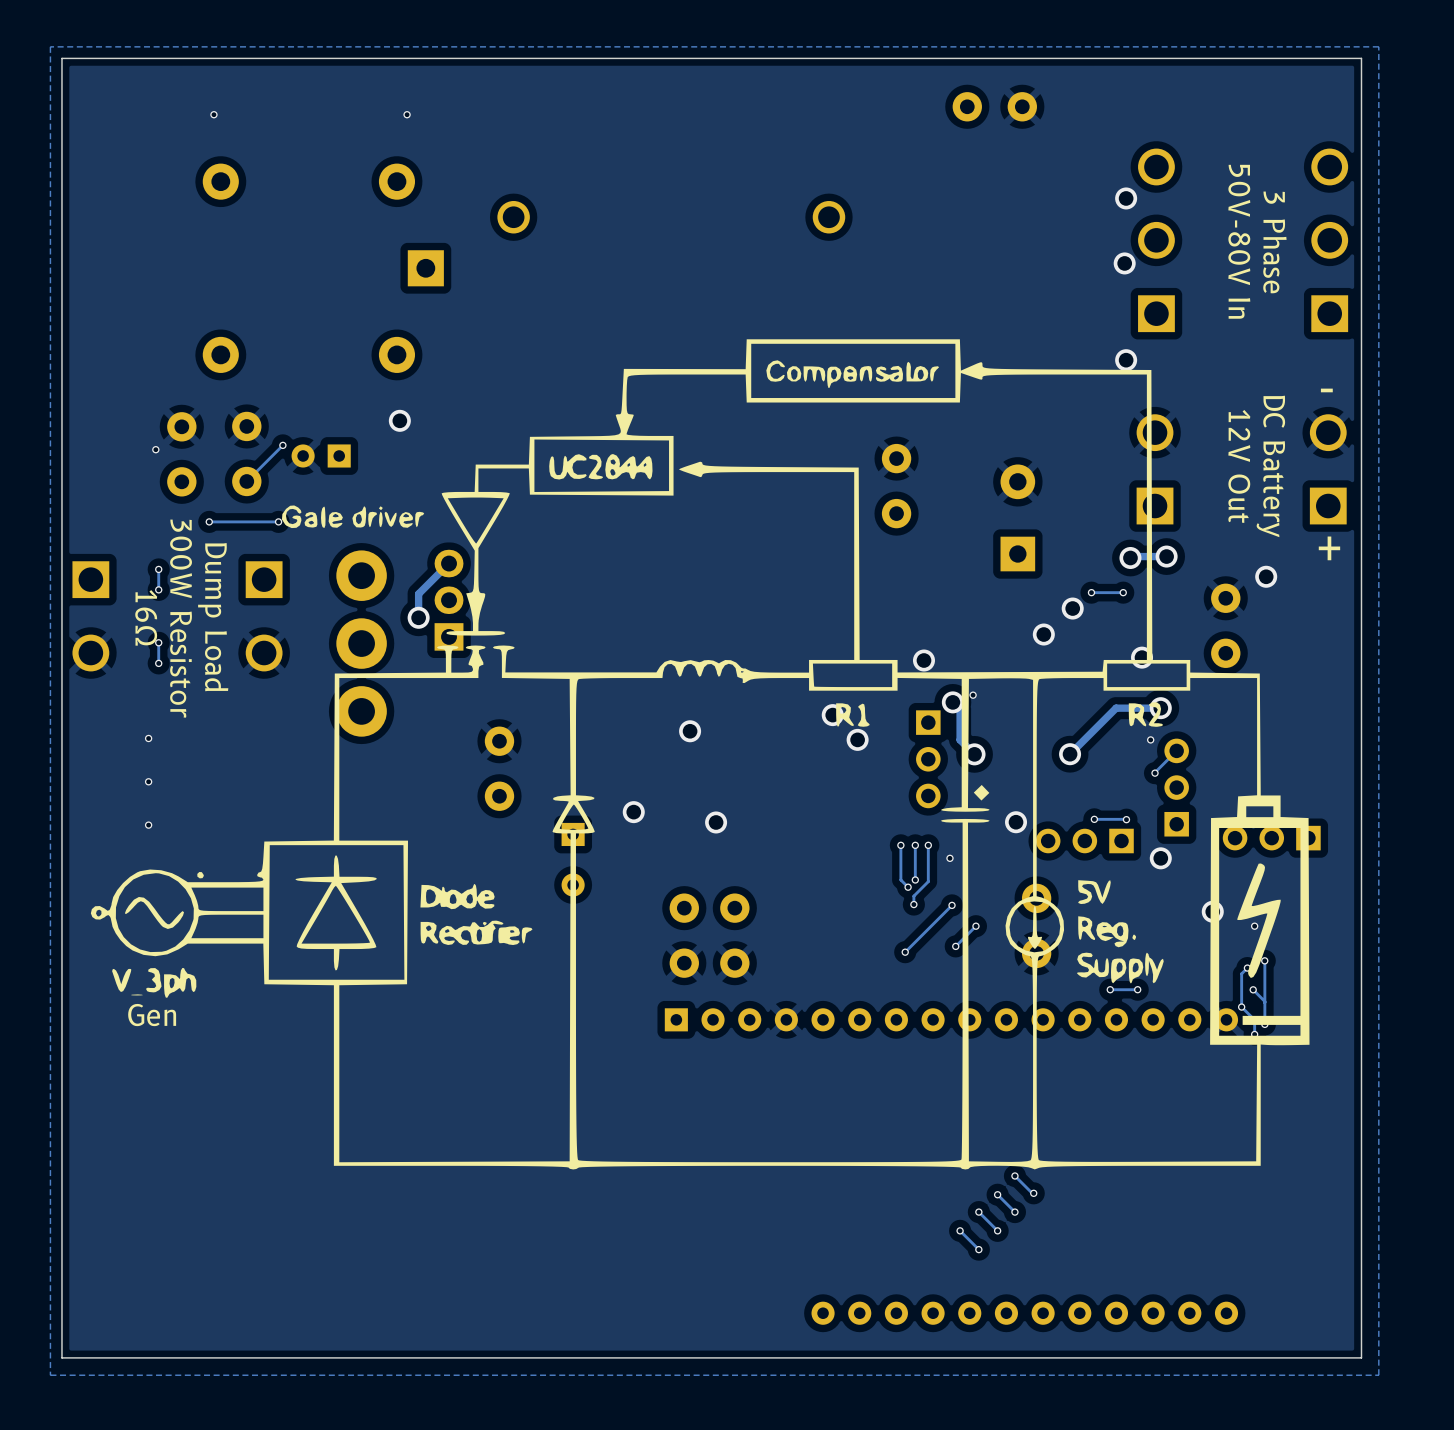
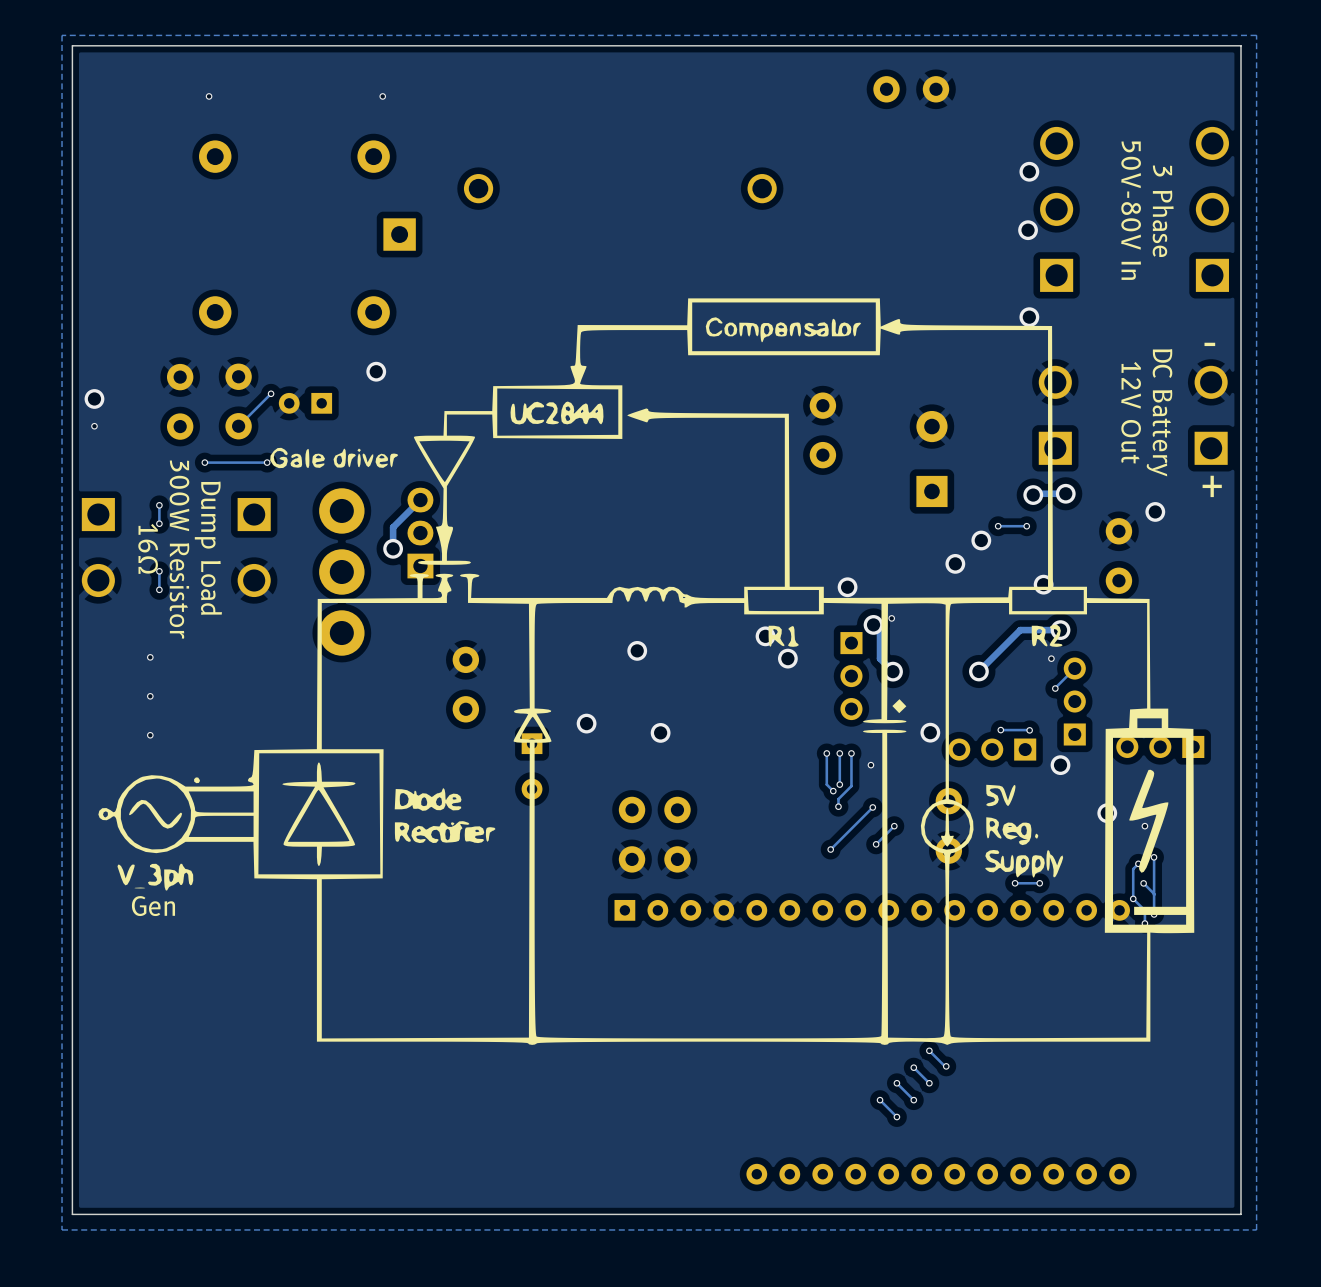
via position: (155, 449) -> (94, 426)
via: none -> (94, 398)

